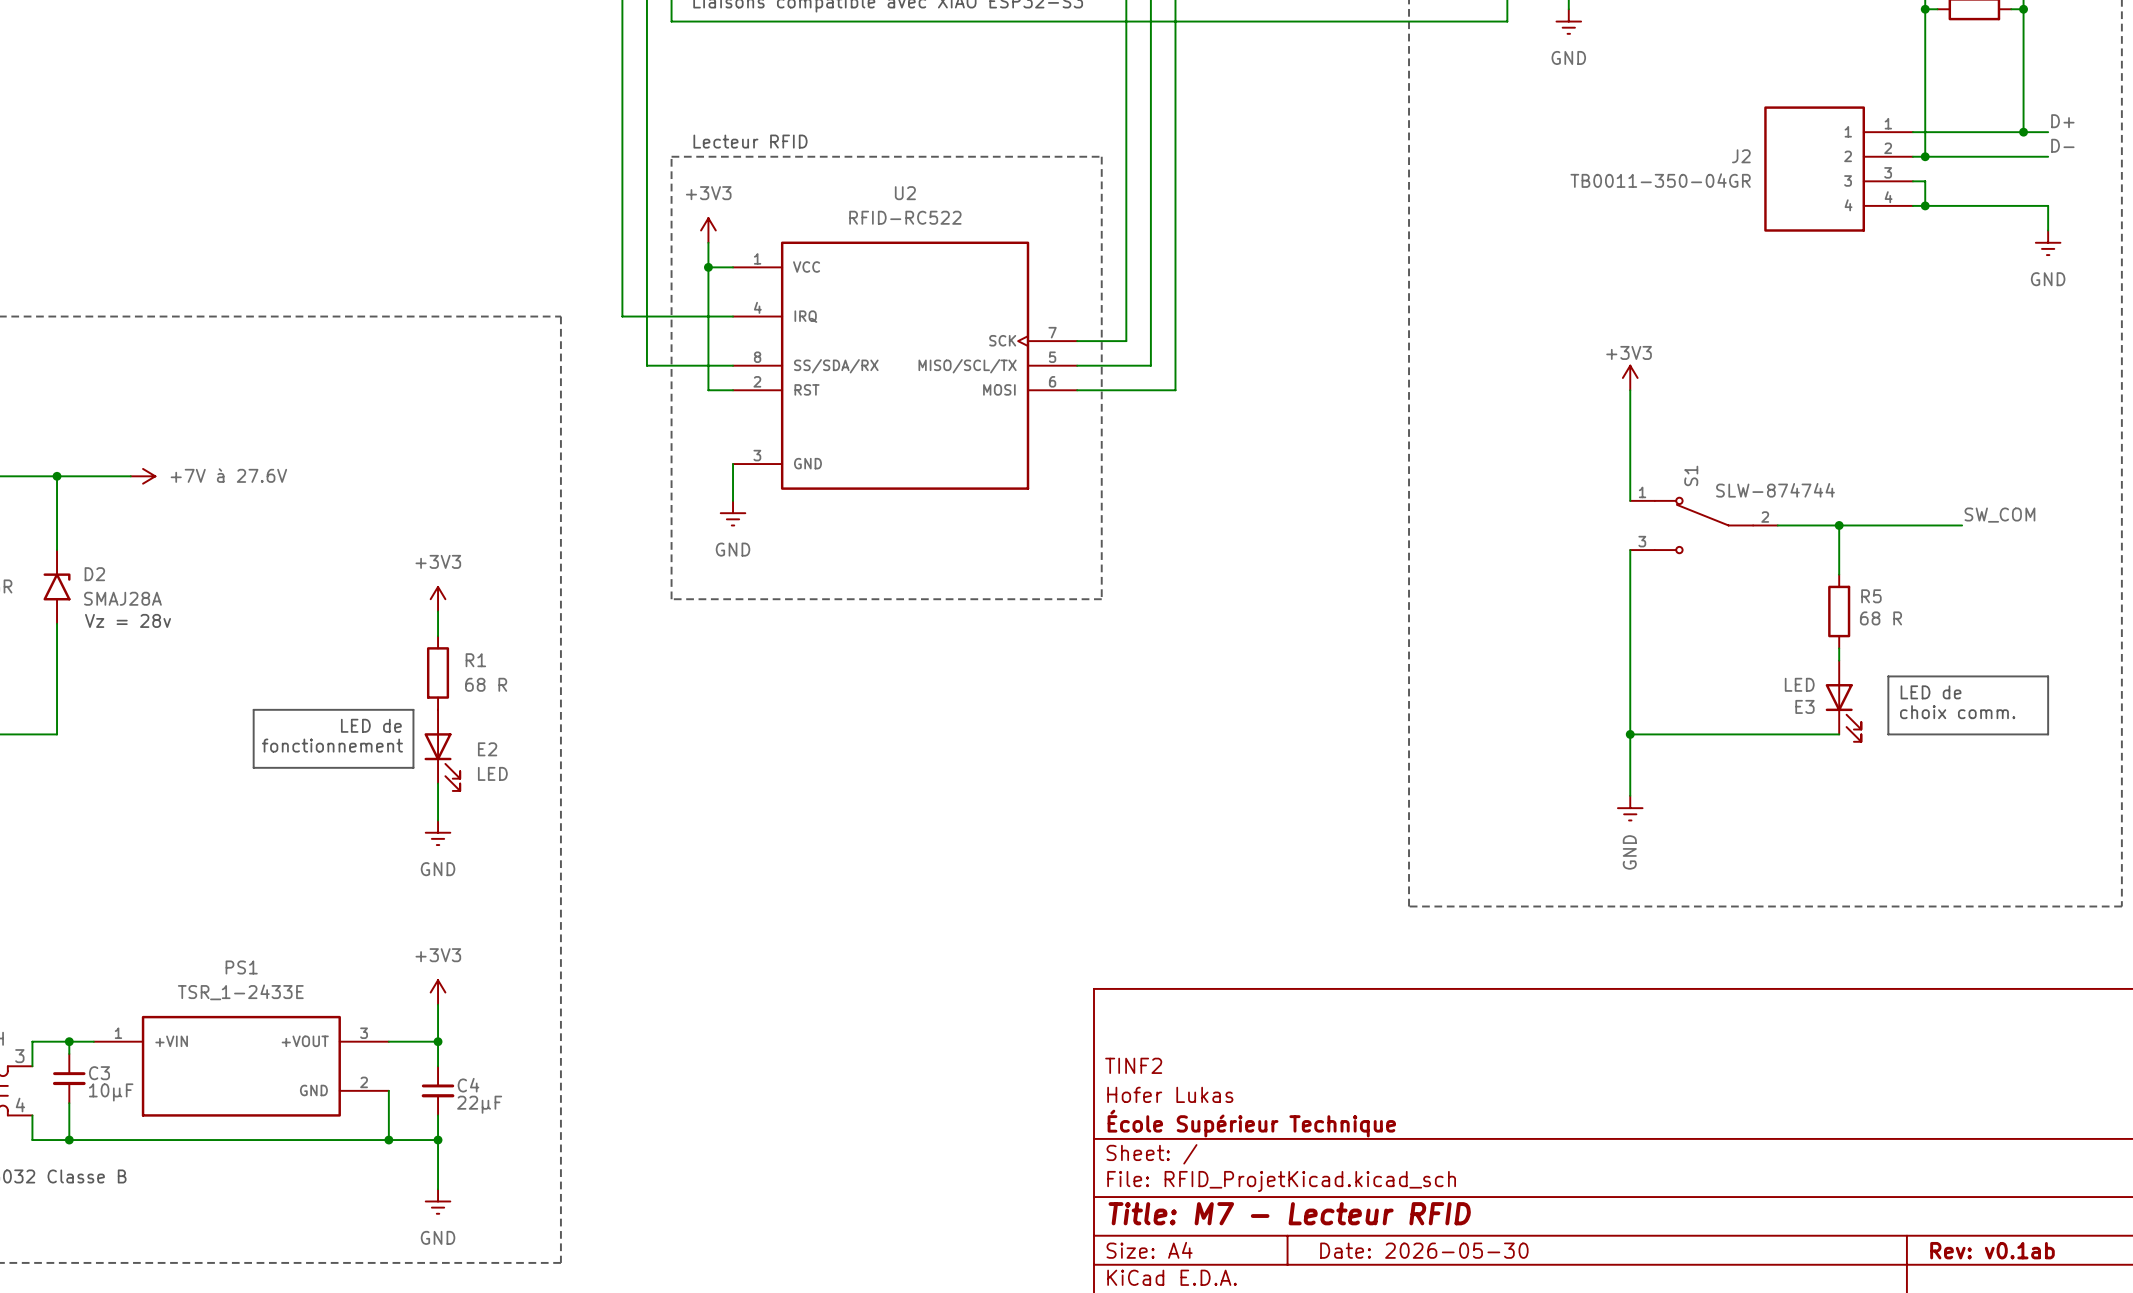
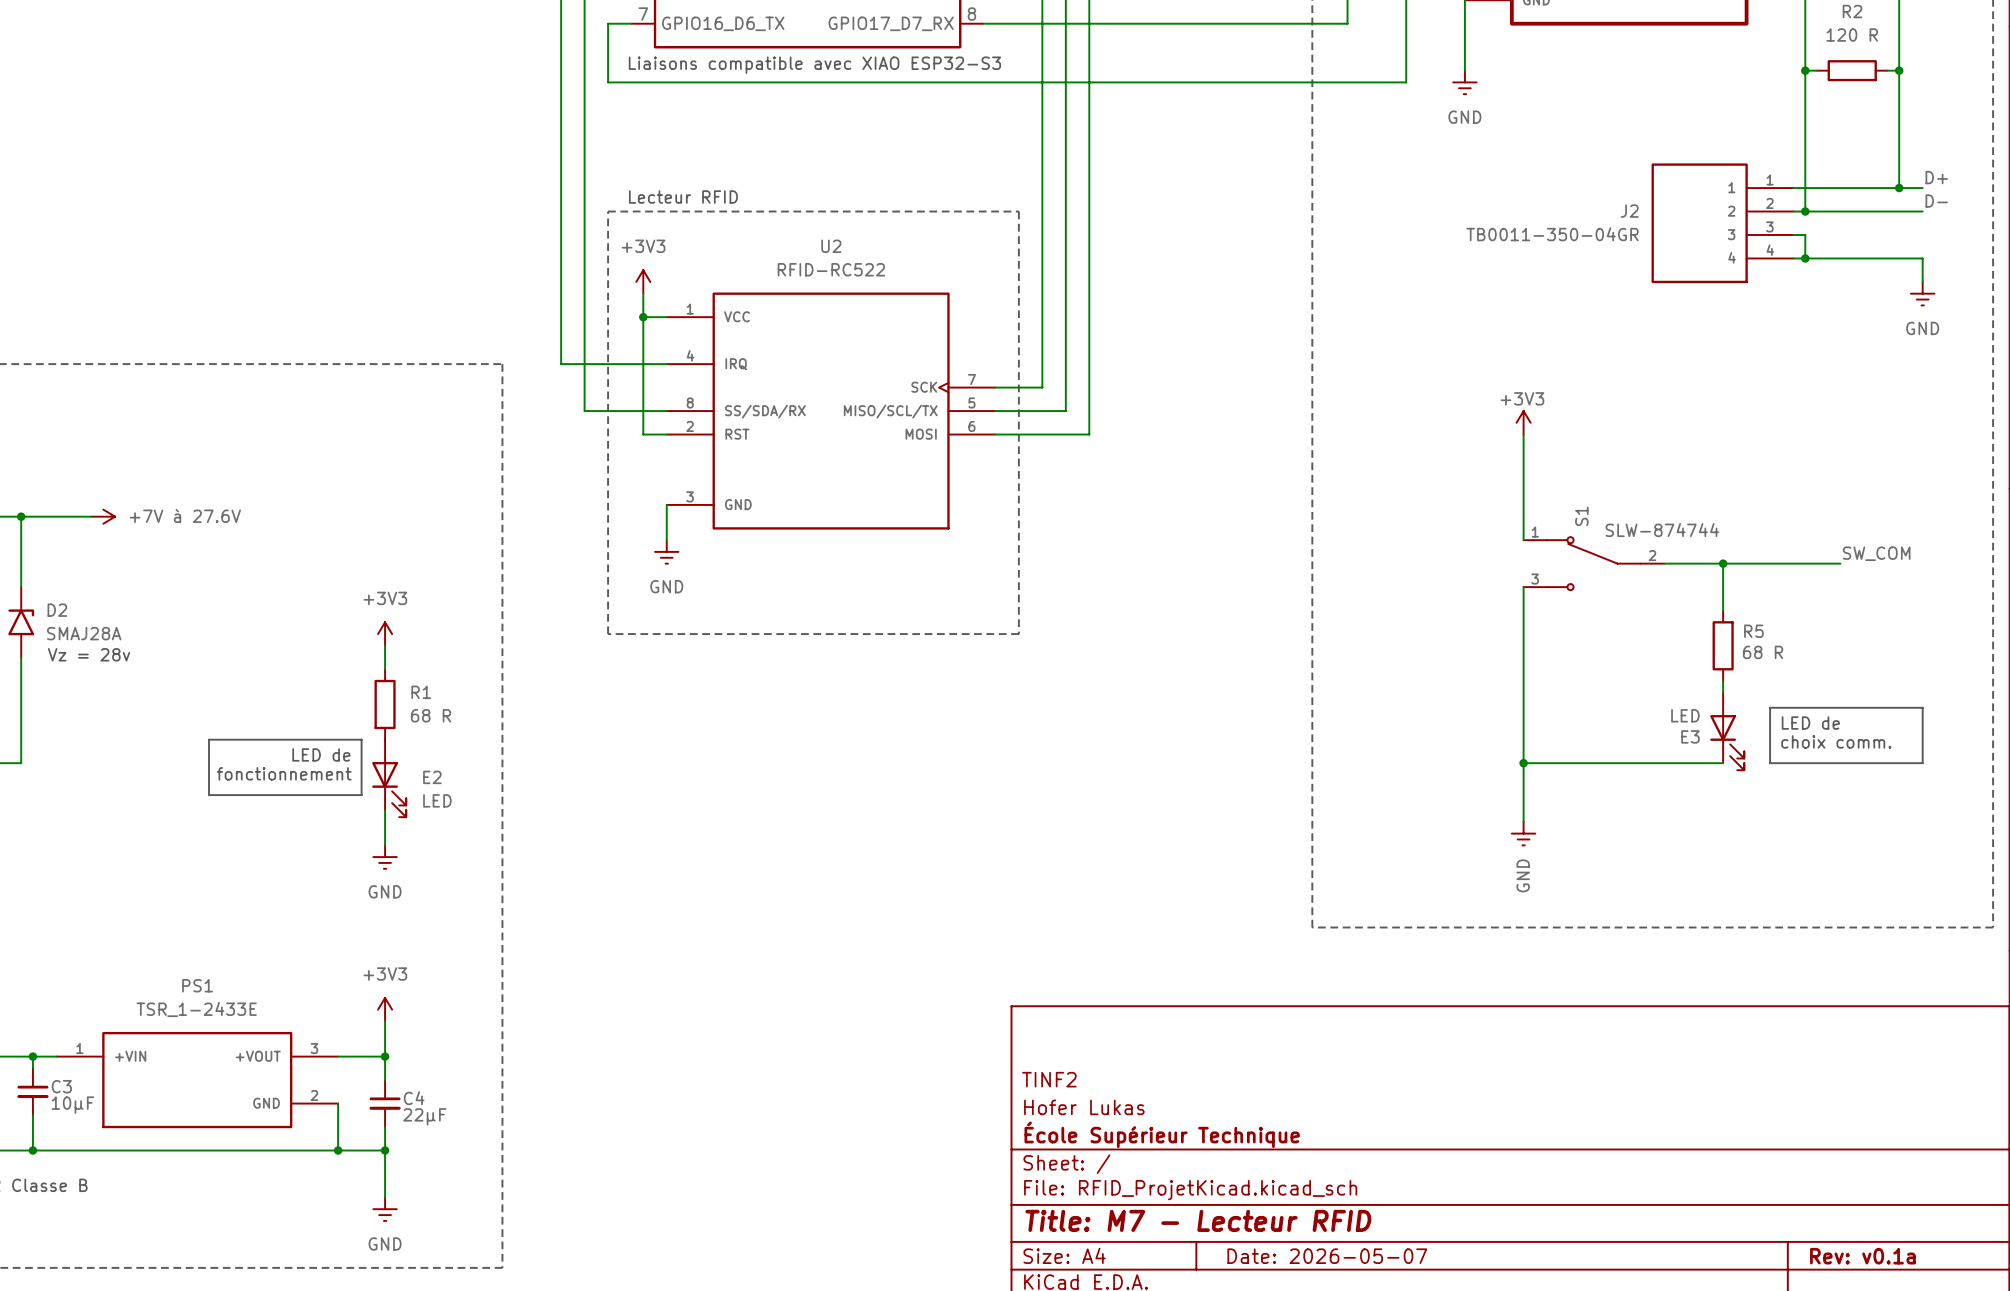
title block: Date: 2026-05-30 (1424, 1250) -> Date: 2026-05-07 (1327, 1256)
title block: Rev: v0.1ab (1992, 1250) -> Rev: v0.1a (1862, 1256)

